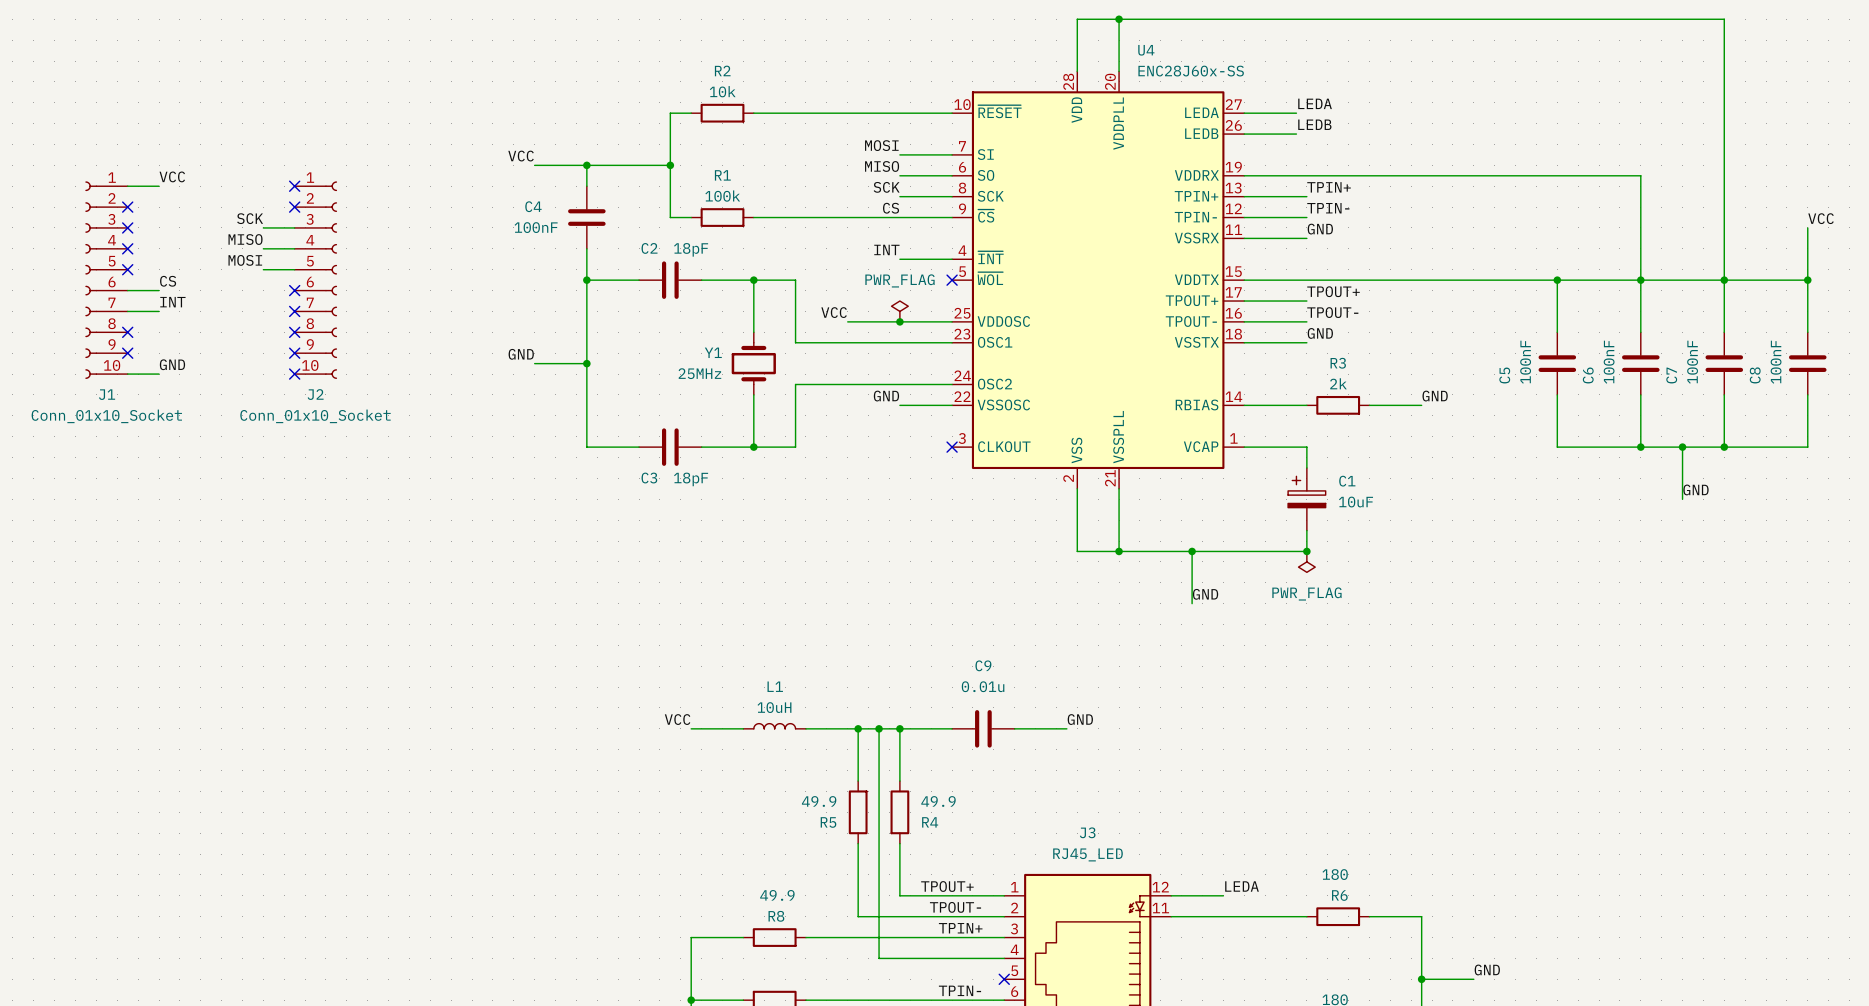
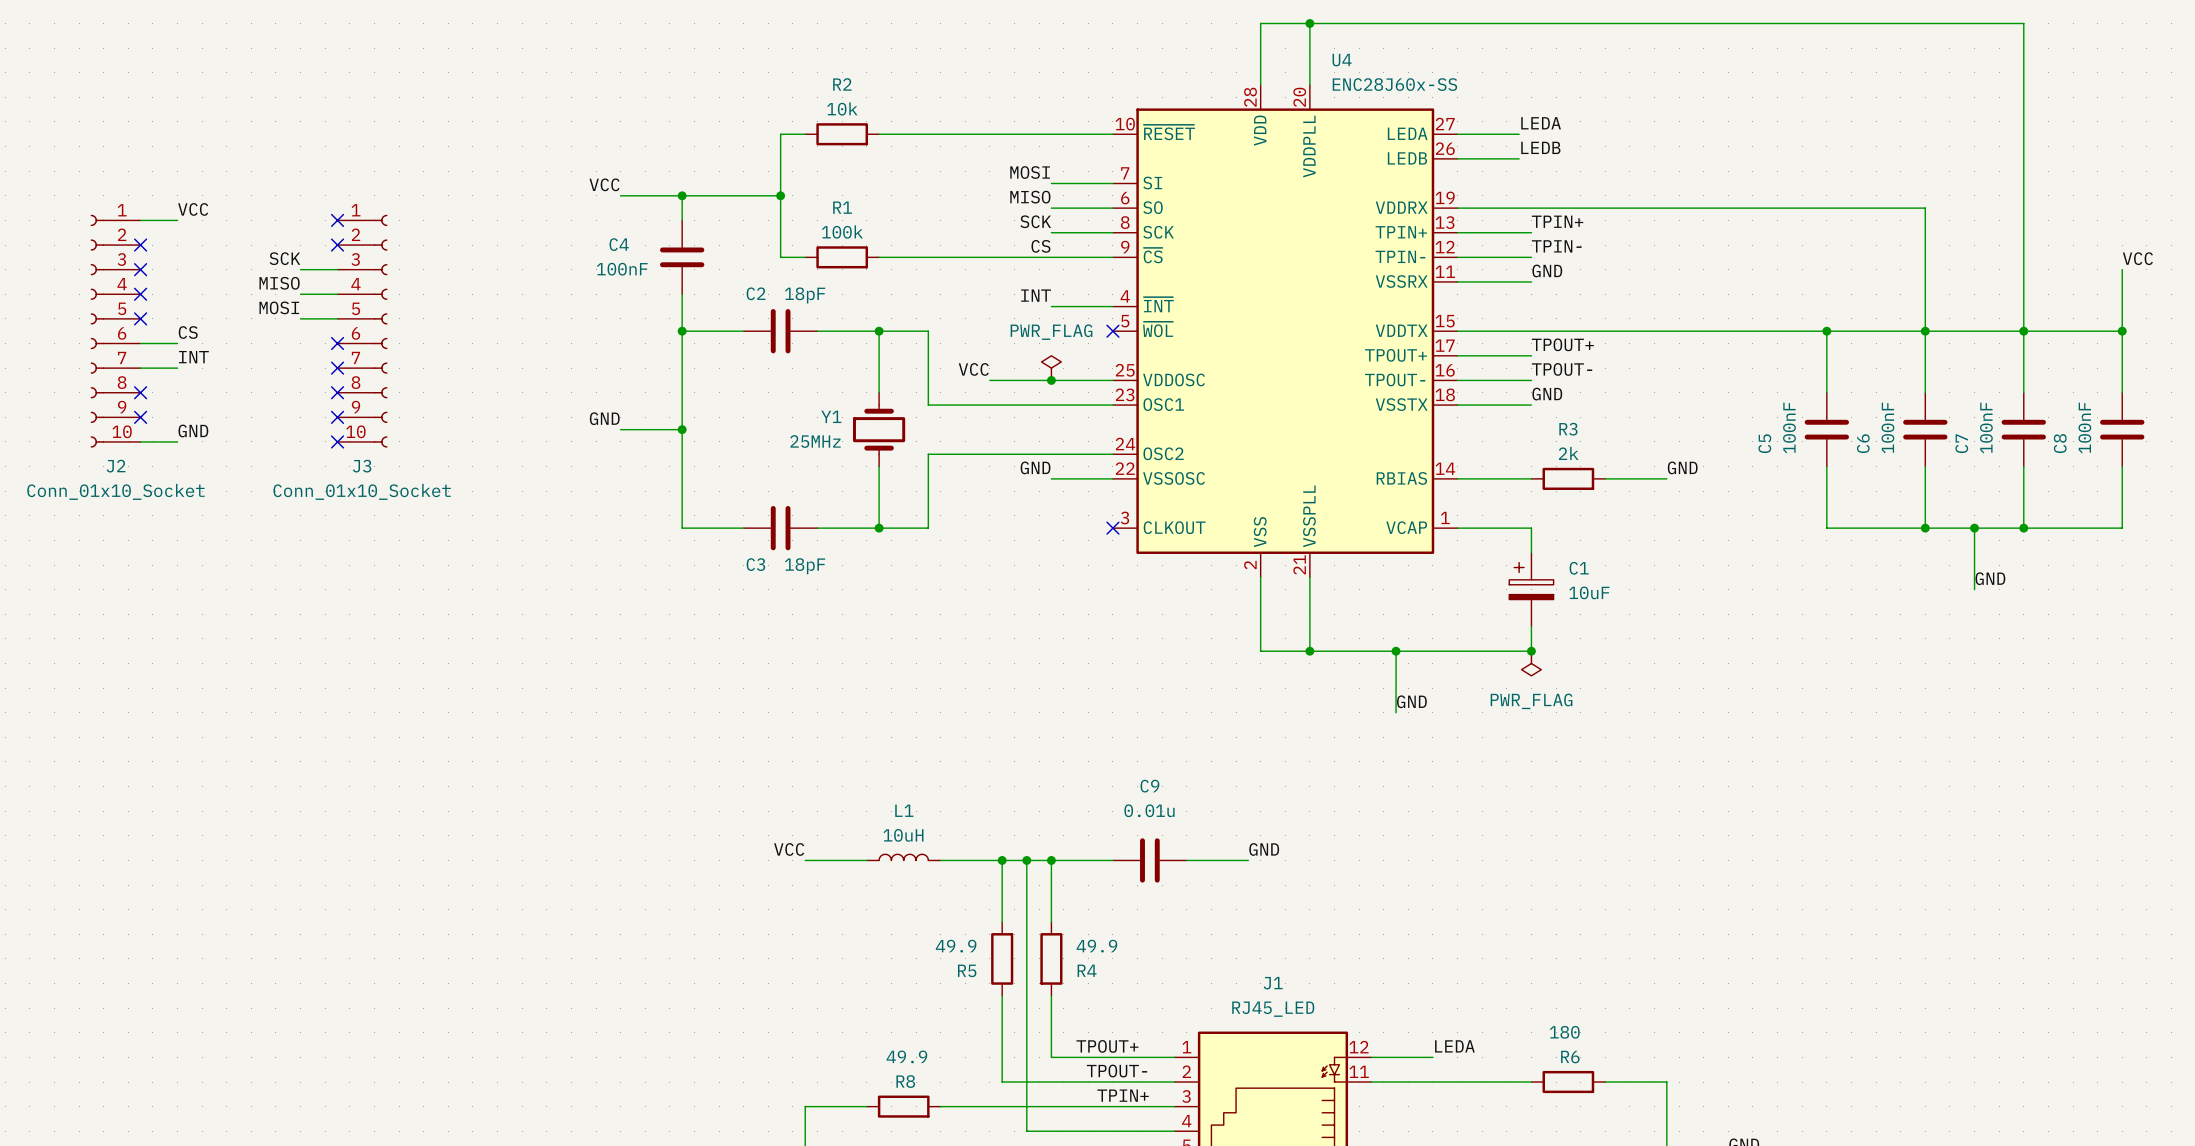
J1 name: J1 (107, 394) -> J2 (116, 466)
J2 name: J2 (315, 394) -> J3 (362, 466)
J3 name: J3 (1087, 832) -> J1 (1273, 983)

